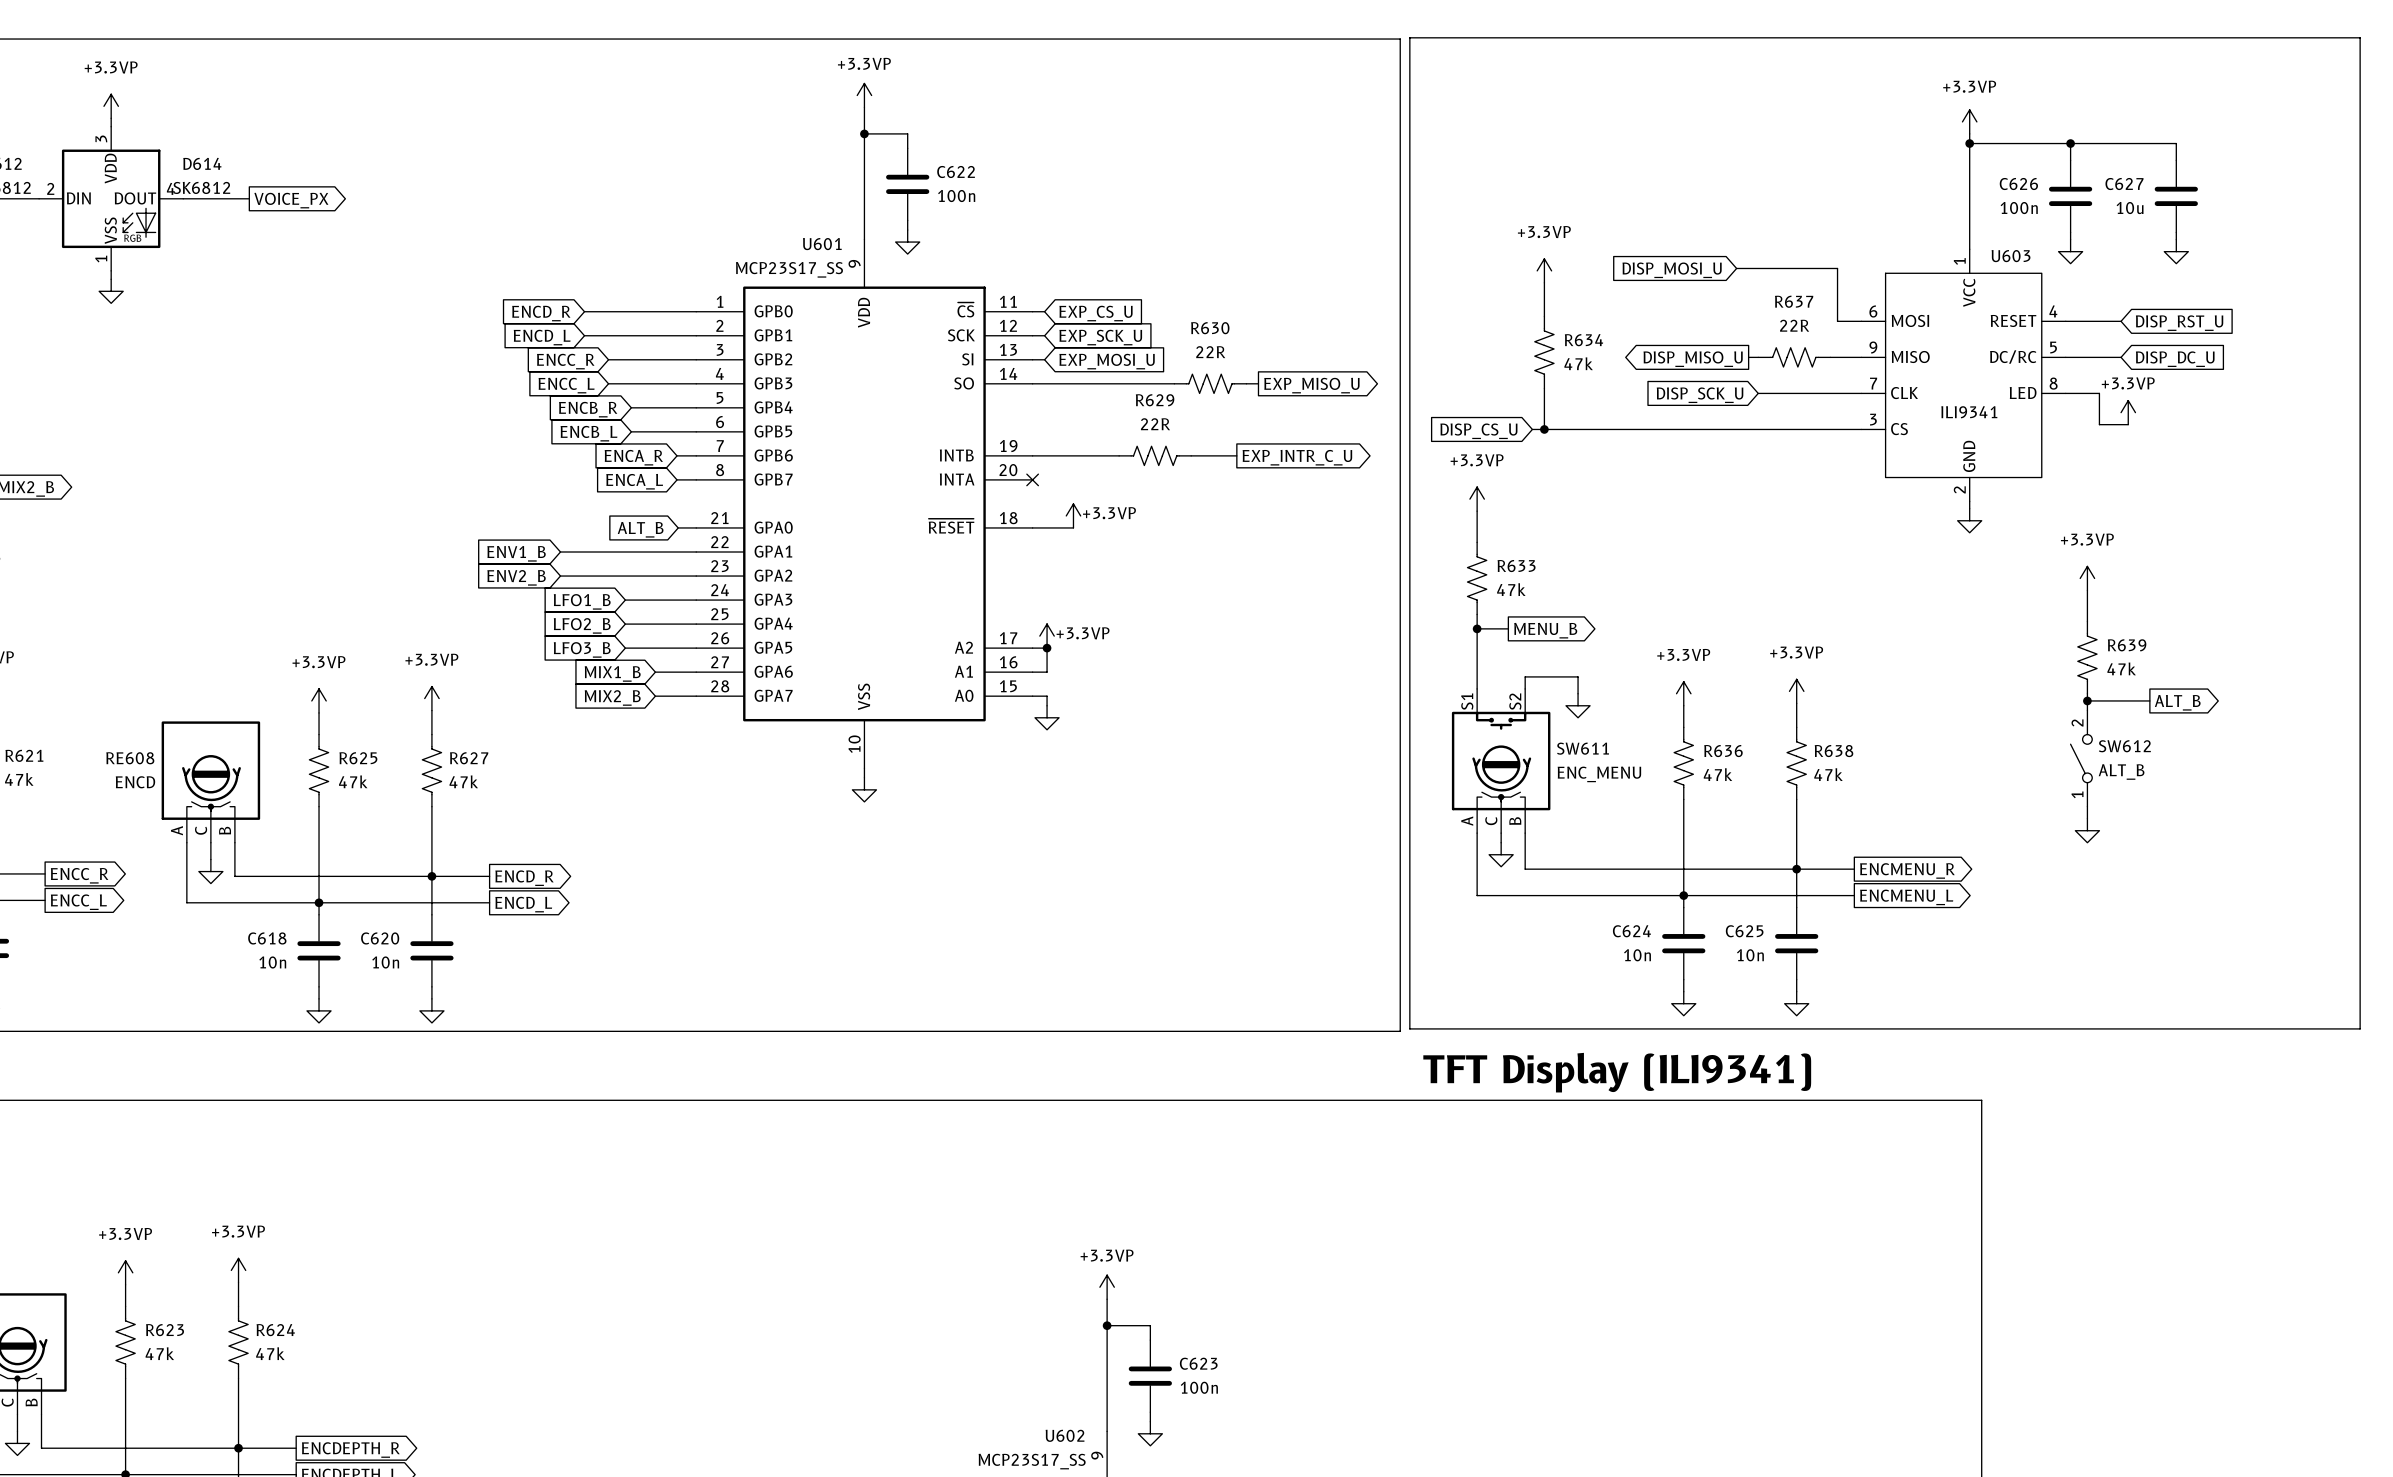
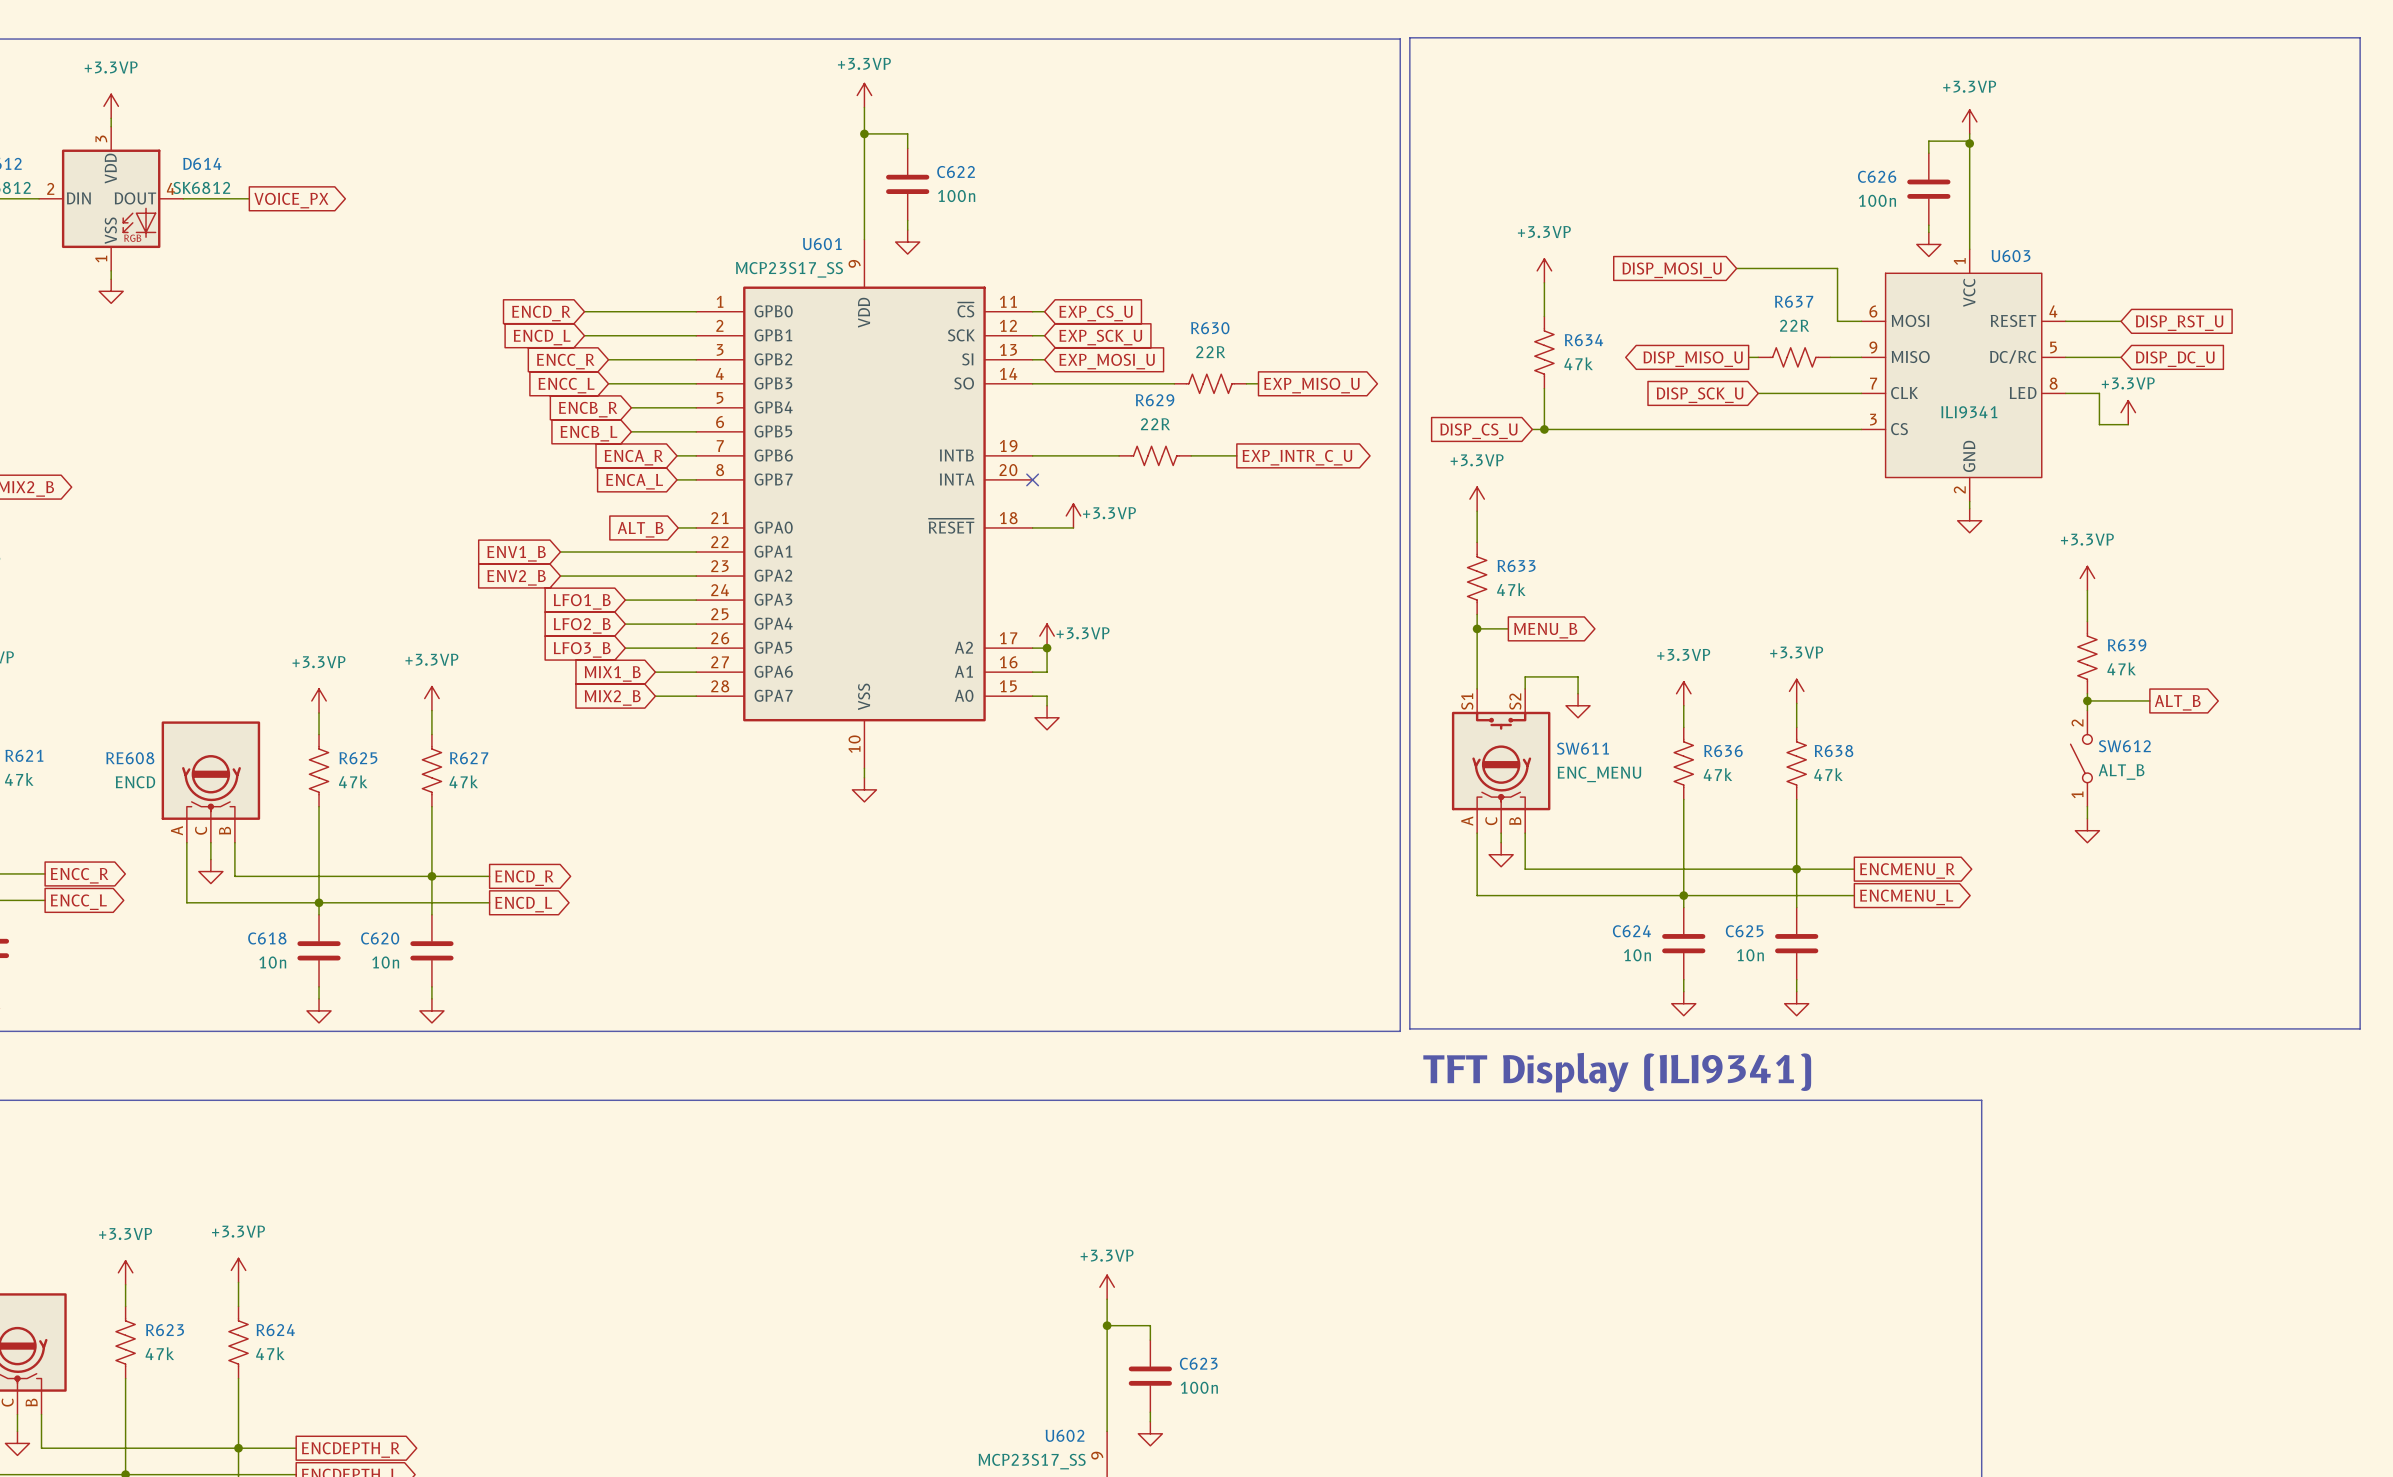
wire: none -> (1969, 141) (1928, 141) (1928, 153)
wire: (1969, 143) (2176, 143) (2176, 160) -> none
wire: (2070, 143) (2070, 160) -> none
junction: (2070, 143) -> none
C626 position: (2070, 196) -> (1928, 189)
C627: 10u (2176, 196) -> none
wire: (2070, 232) (2070, 239) -> (1928, 225) (1928, 232)
wire: (2176, 232) (2176, 239) -> none
power symbol: none -> (1928, 244)
power symbol: (2070, 251) -> none
power symbol: (2176, 251) -> none

